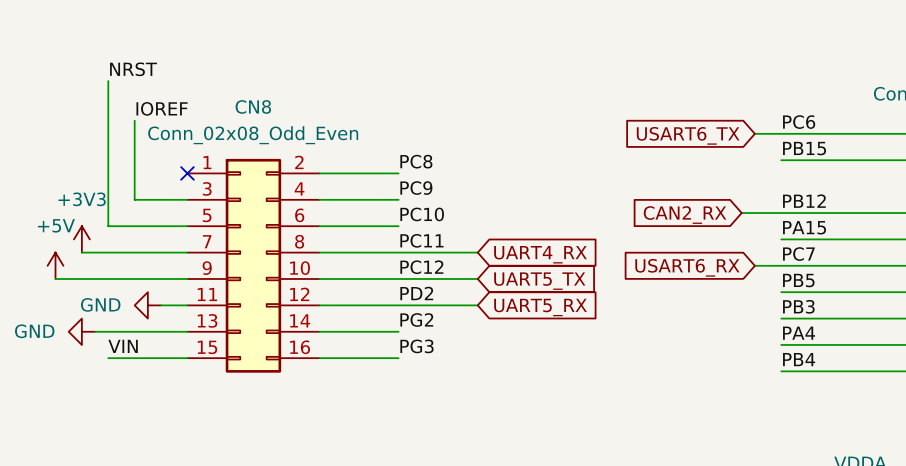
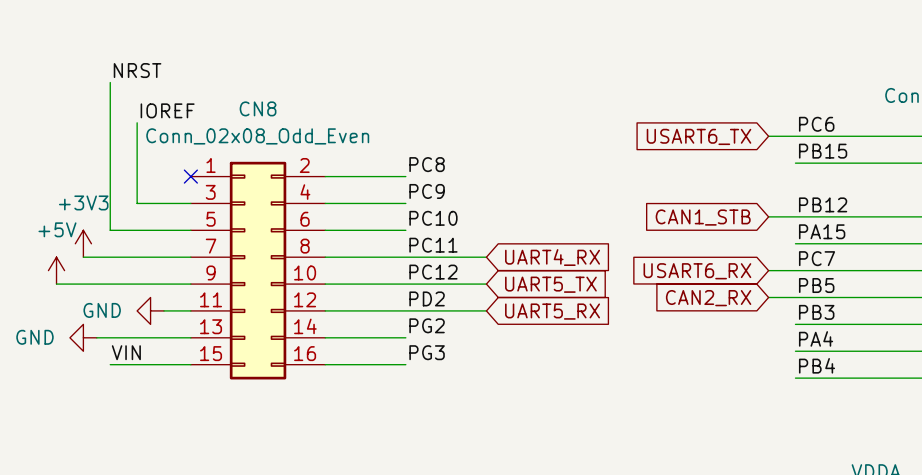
wire: (741, 213) (754, 213) -> none
global label position: CAN2_RX (685, 215) -> CAN2_RX (708, 298)
global label: none -> CAN1_STB (703, 217)
wire: none -> (768, 297) (795, 297)

